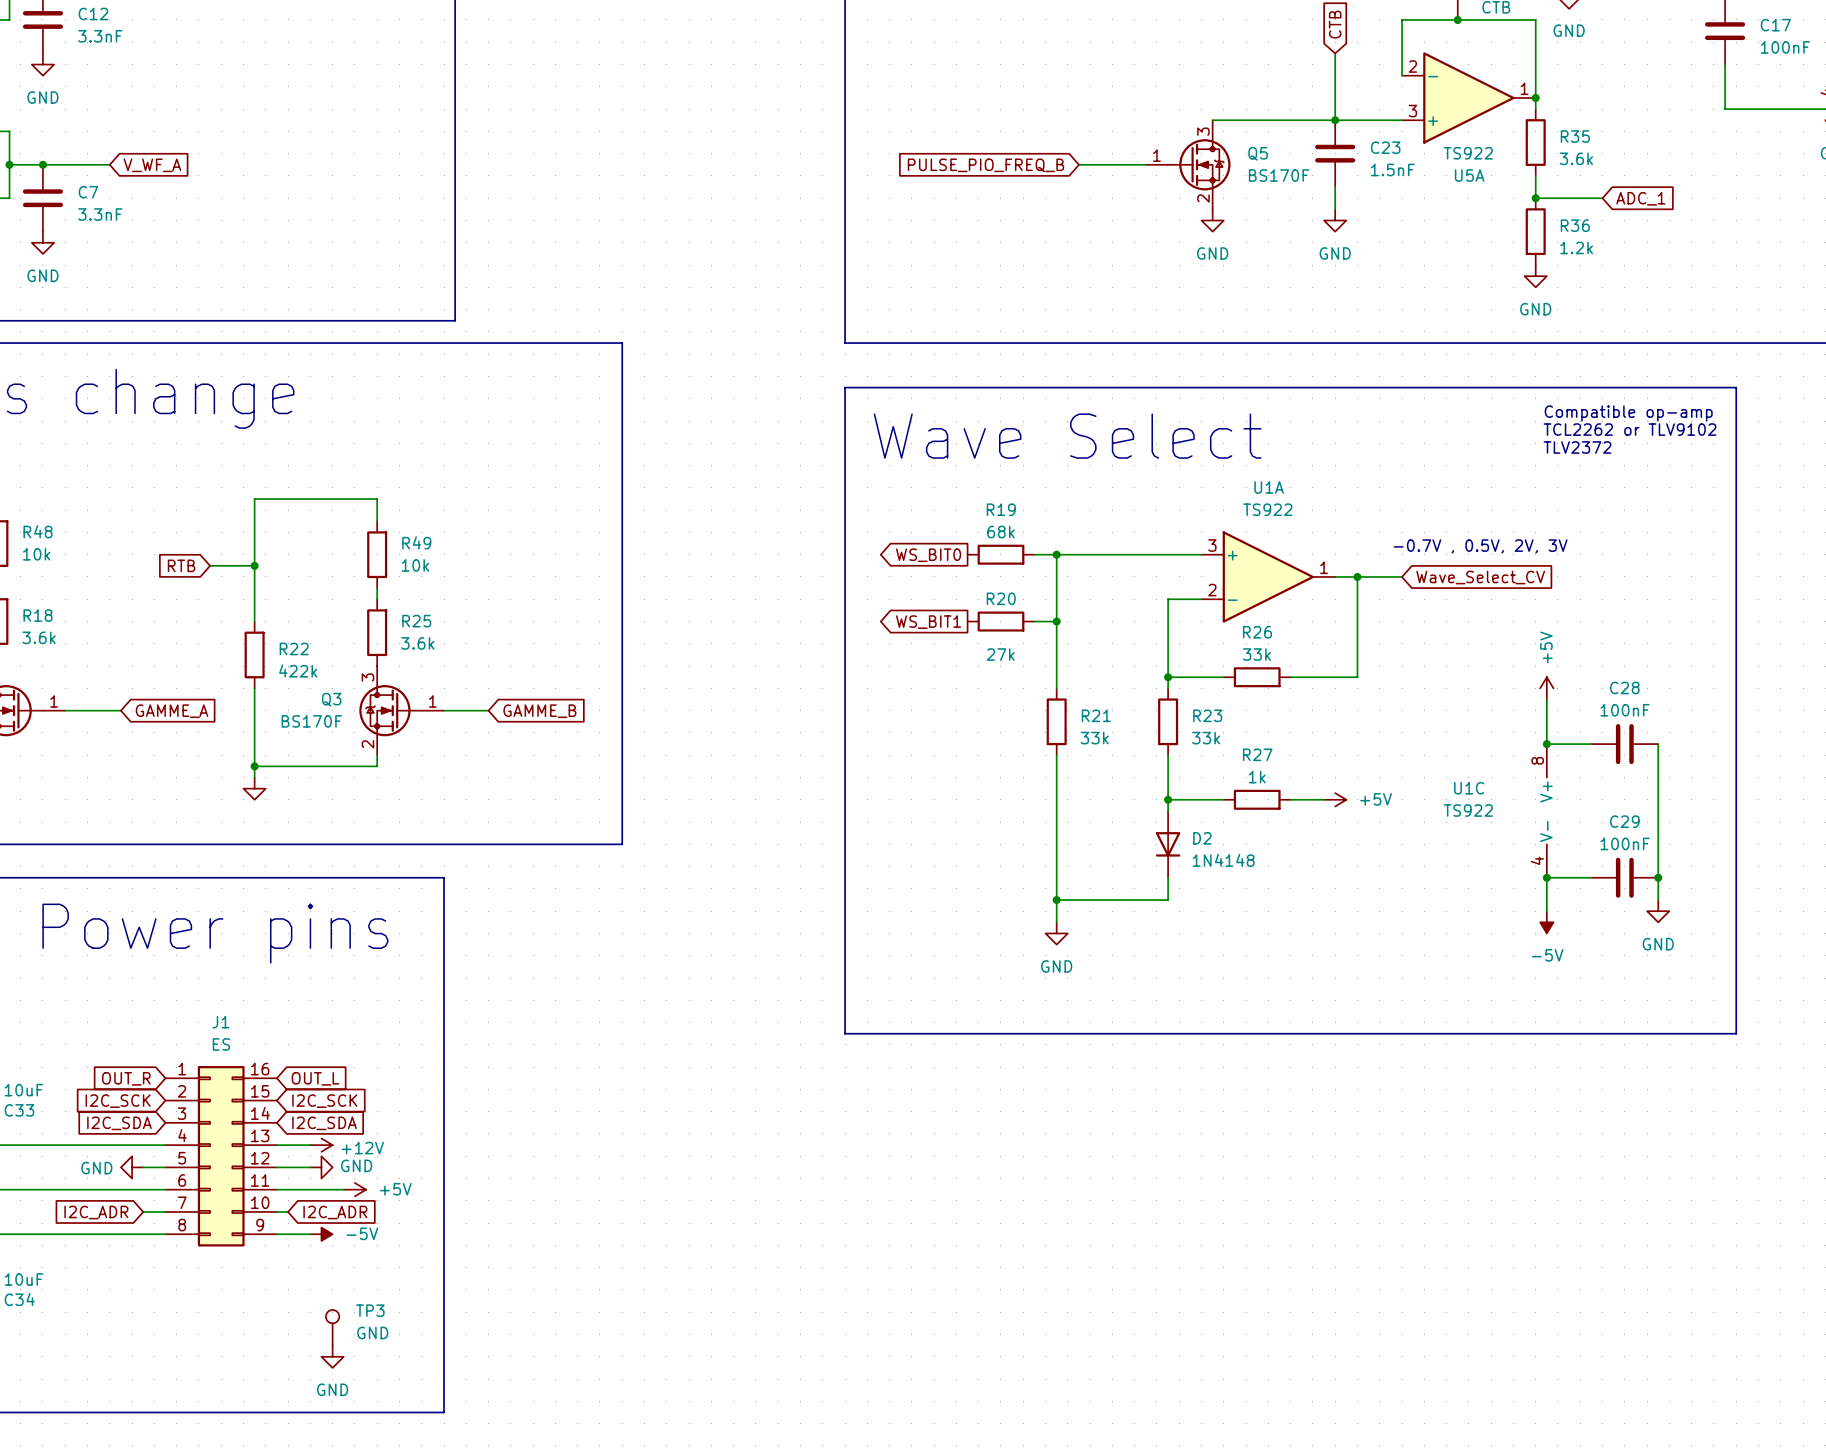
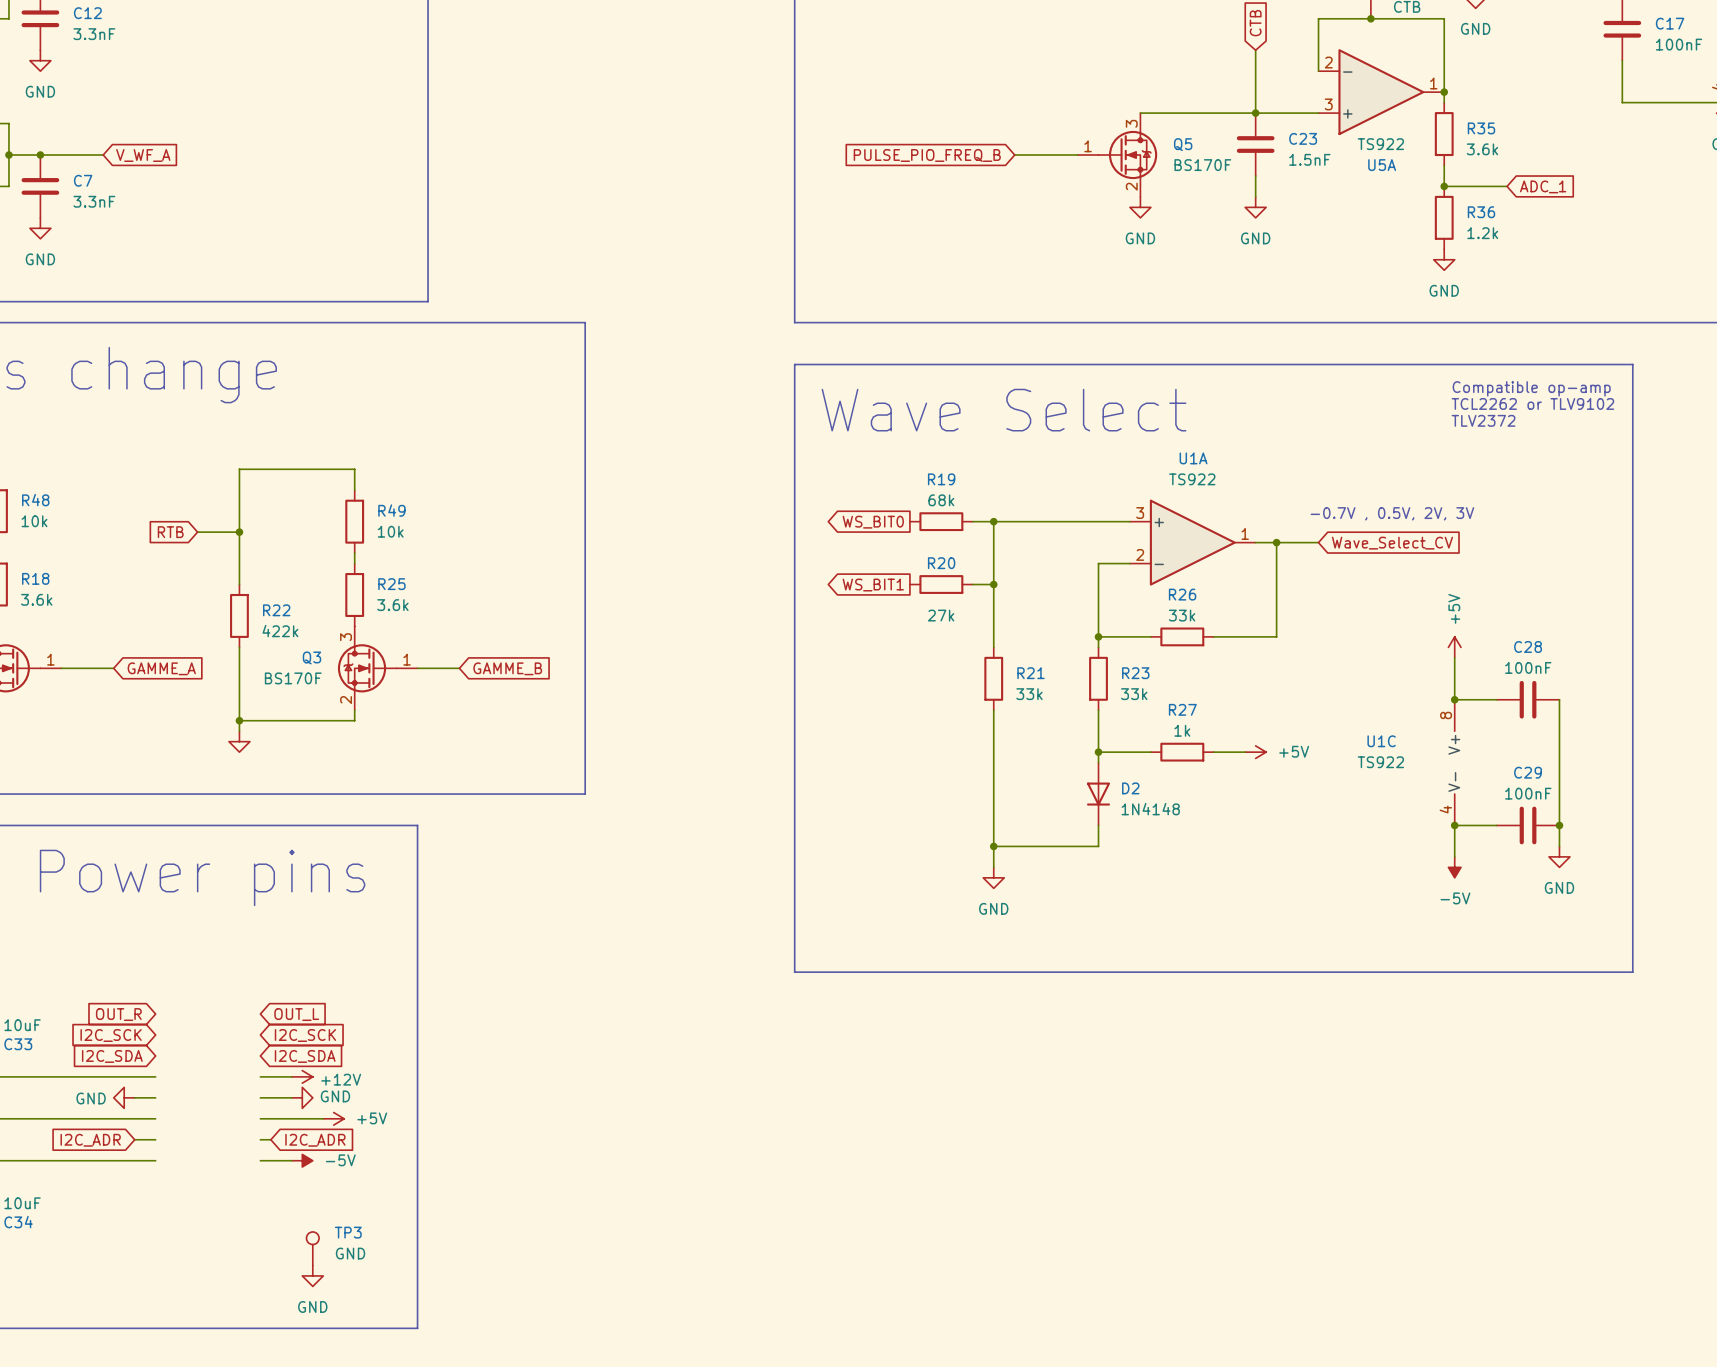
J1: ES (221, 1156) -> none

